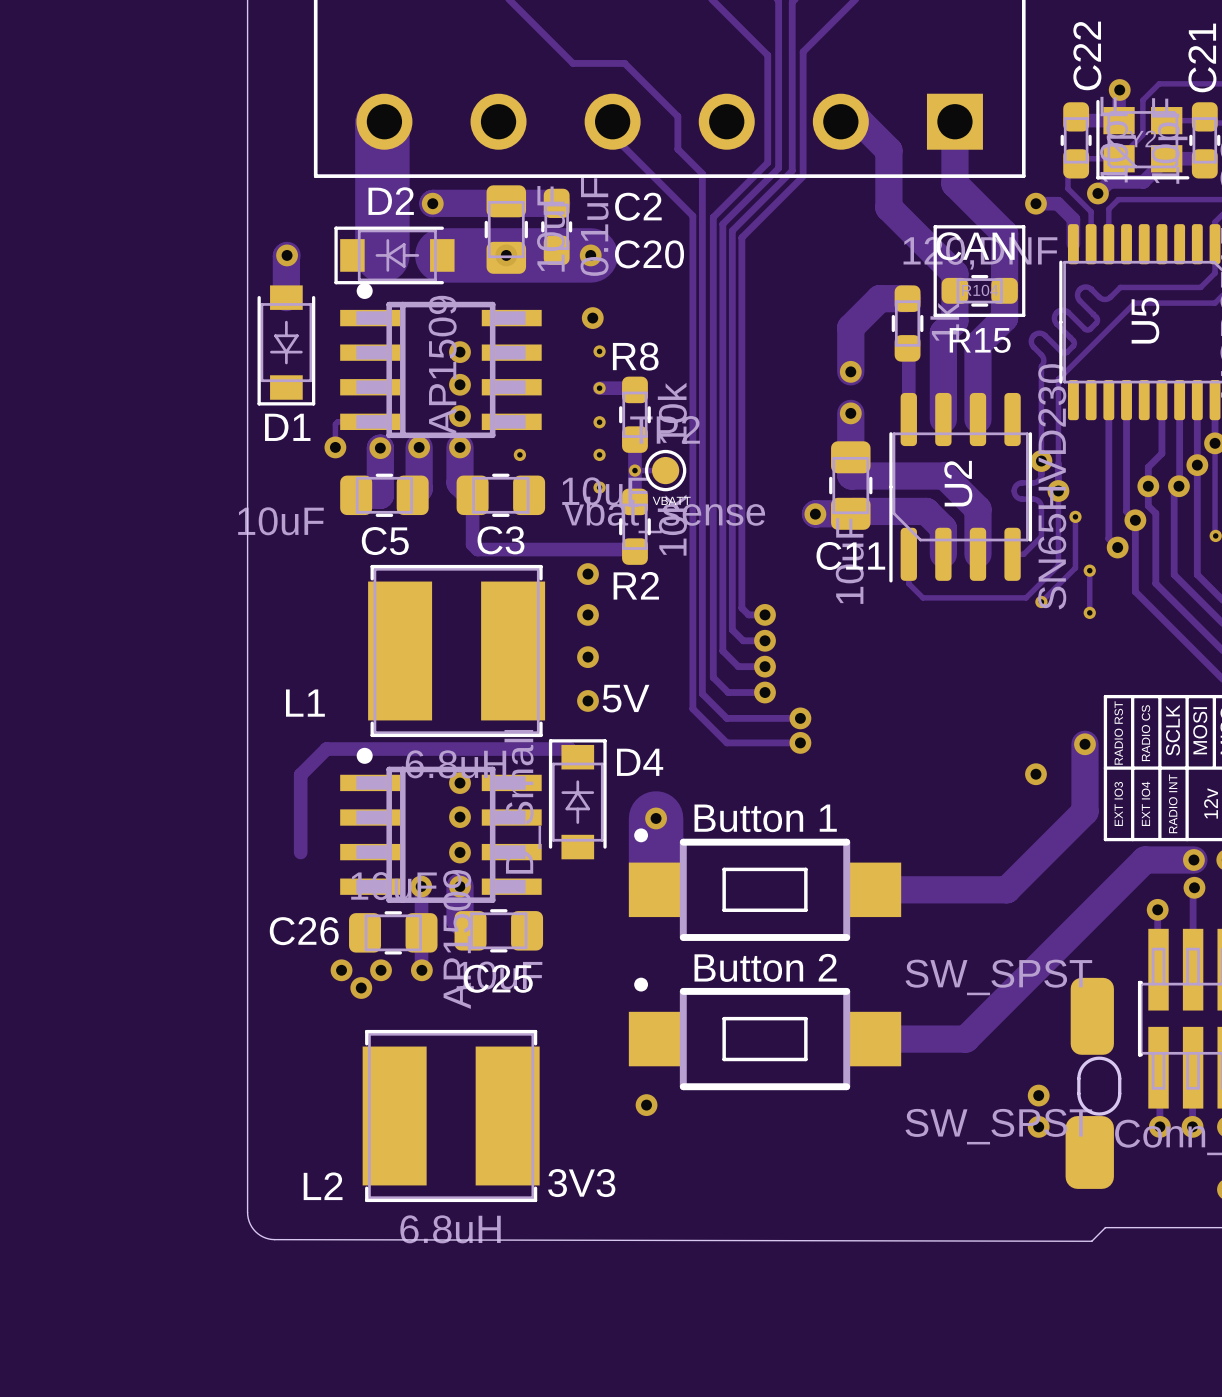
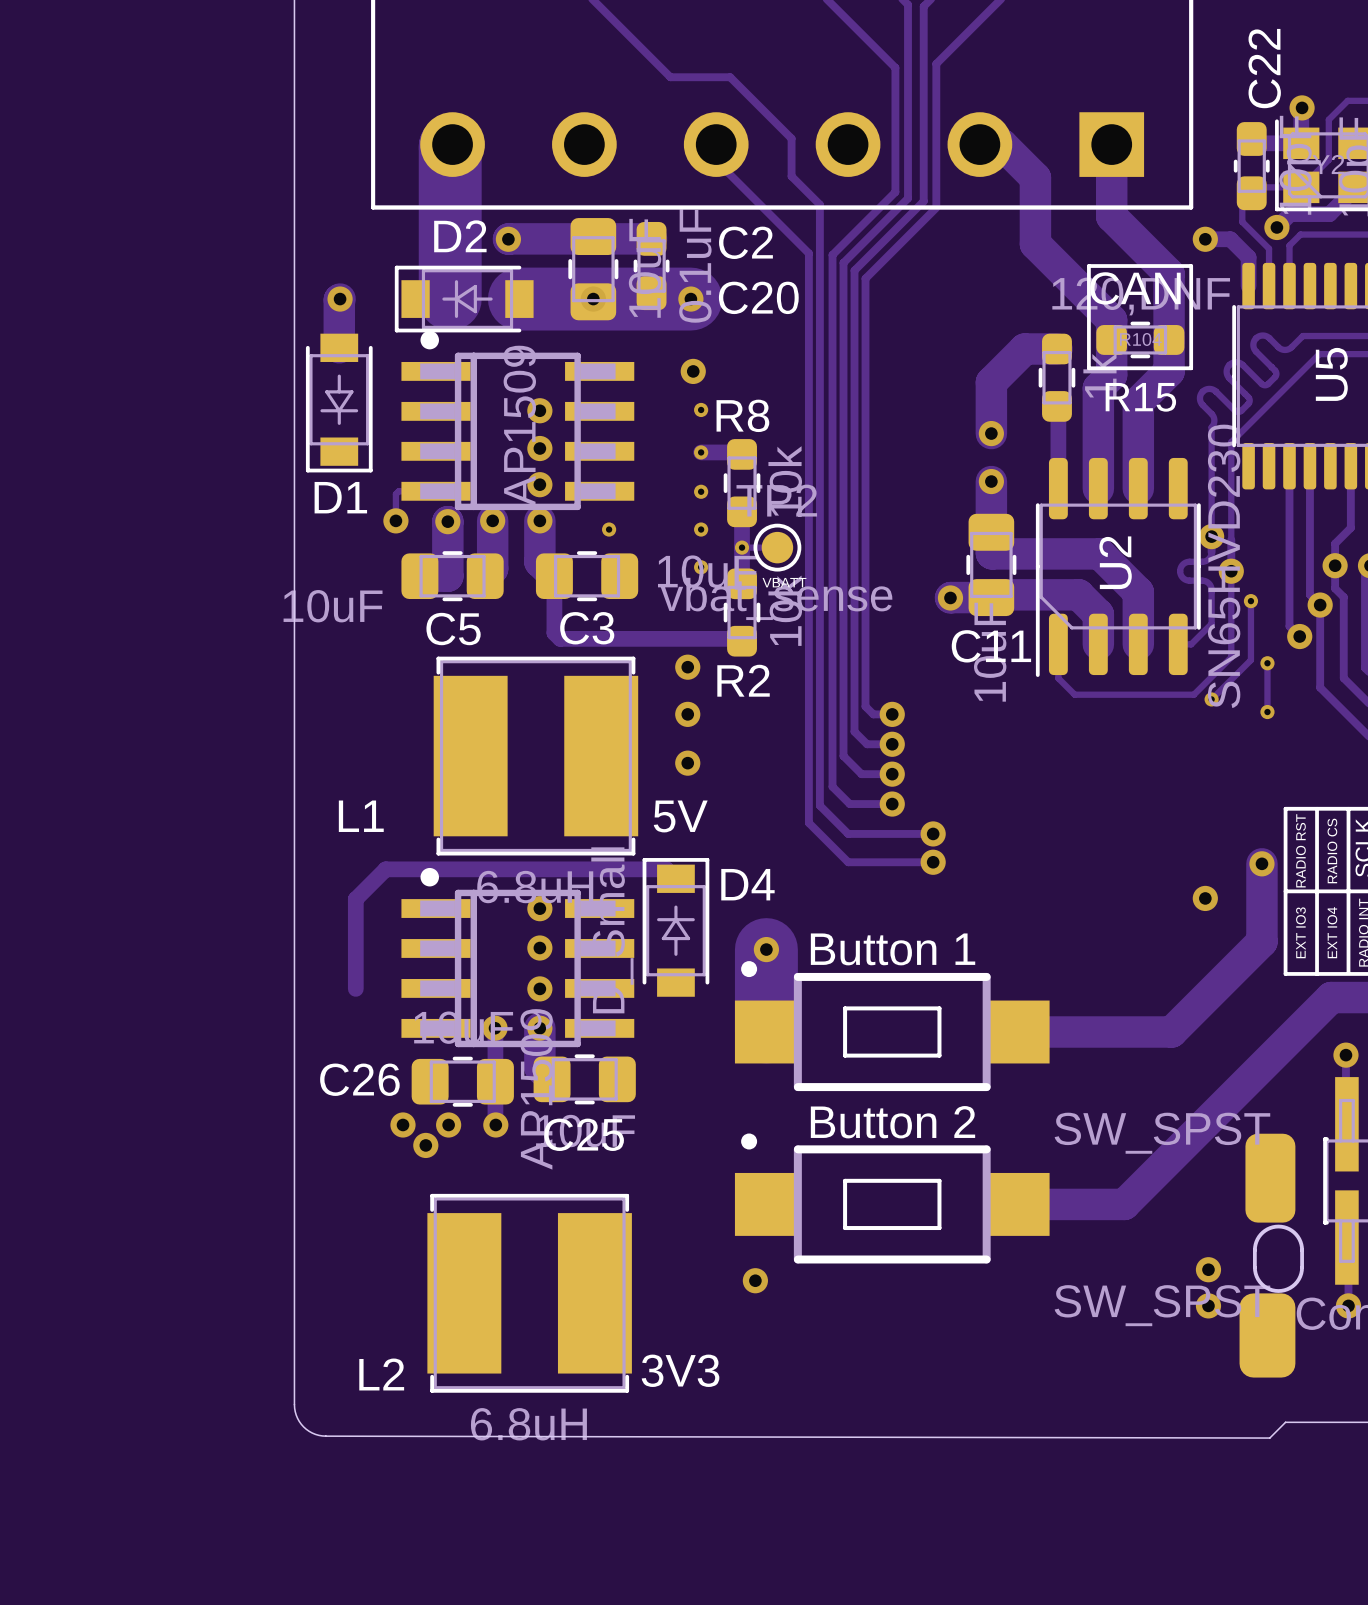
text position: 5V (626, 698) -> 5V (680, 816)
via: (587, 700) -> none

